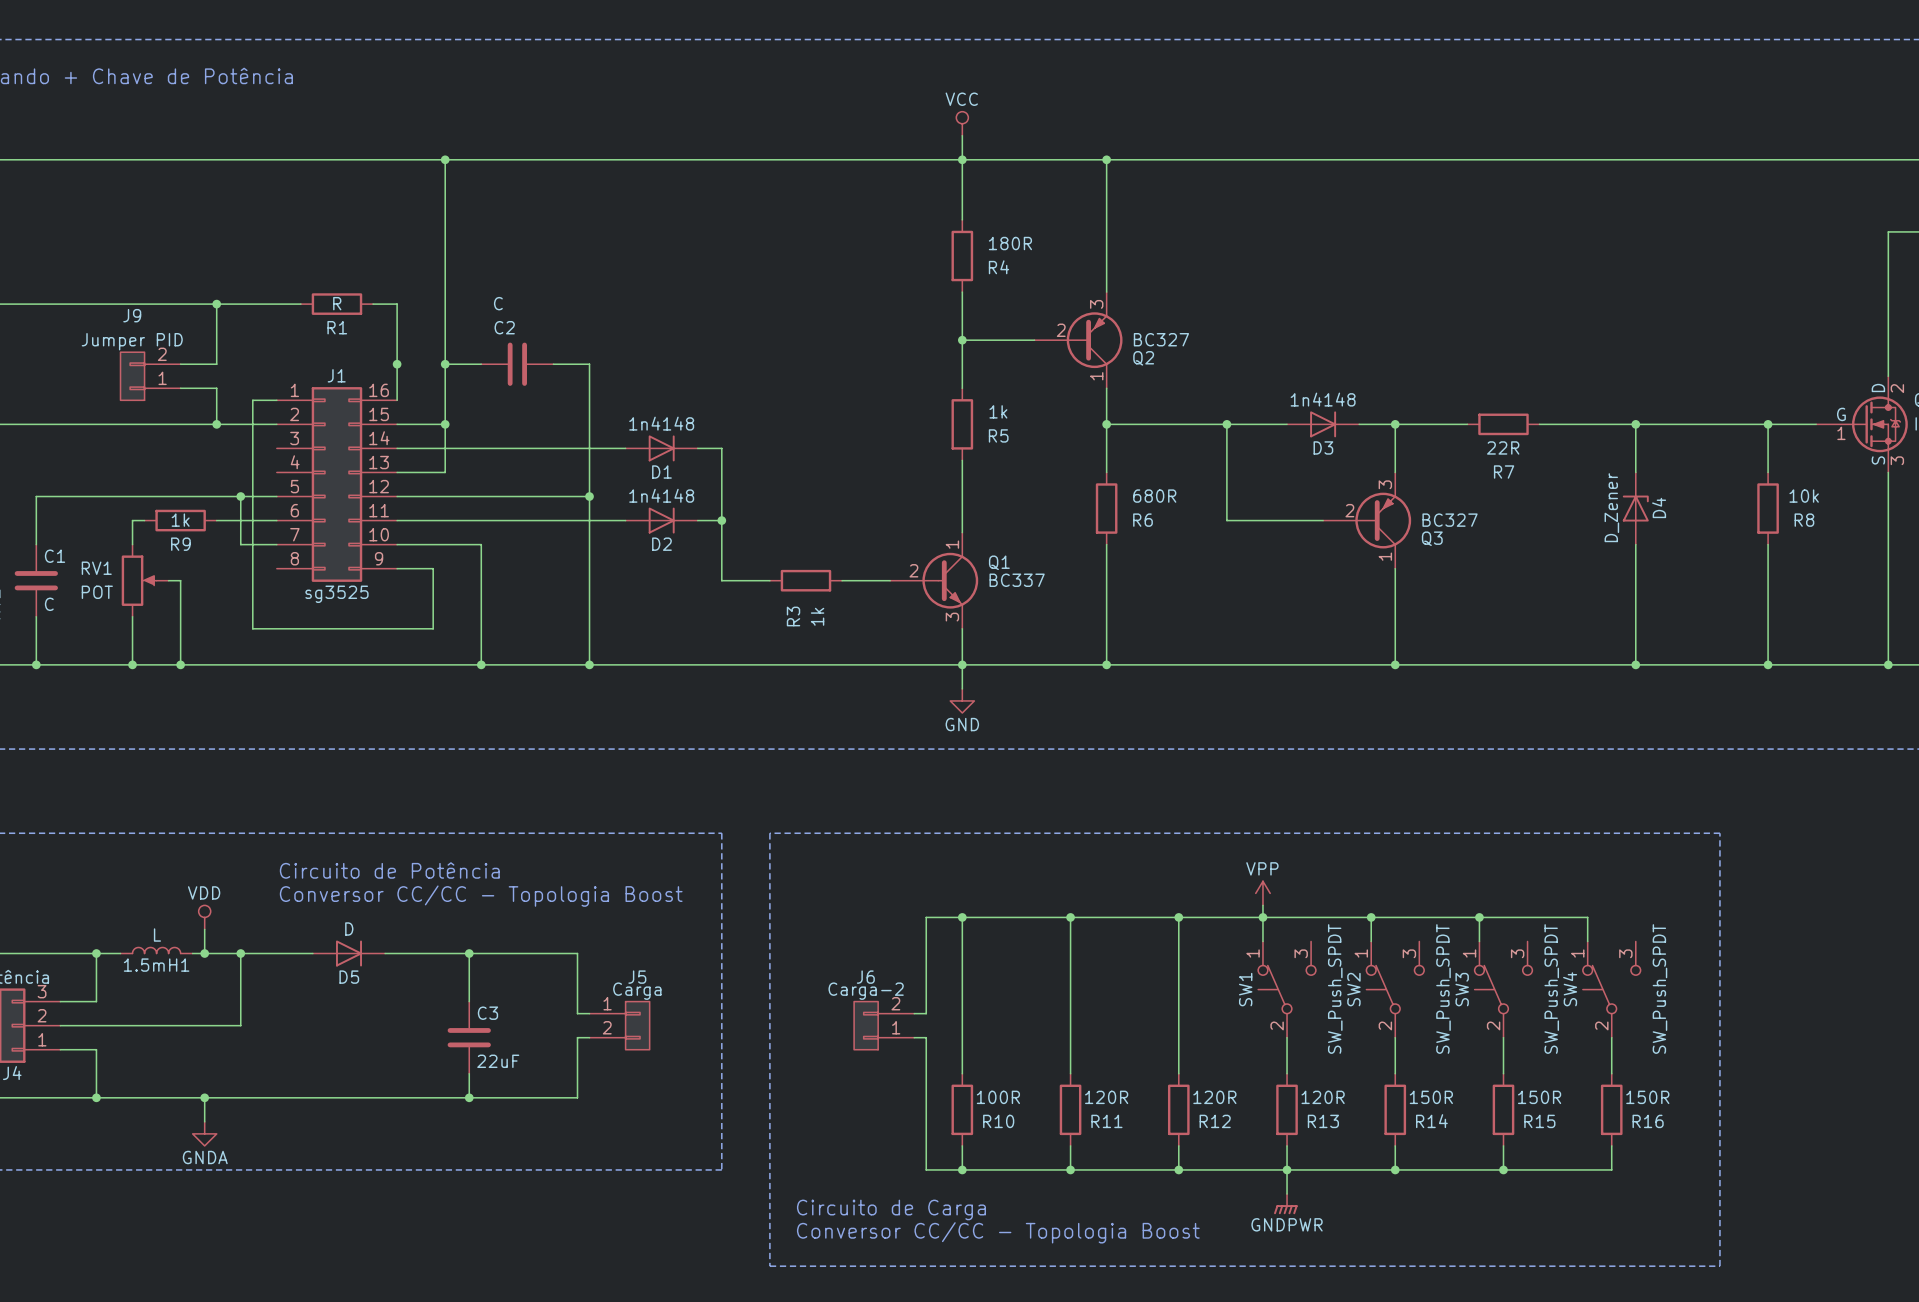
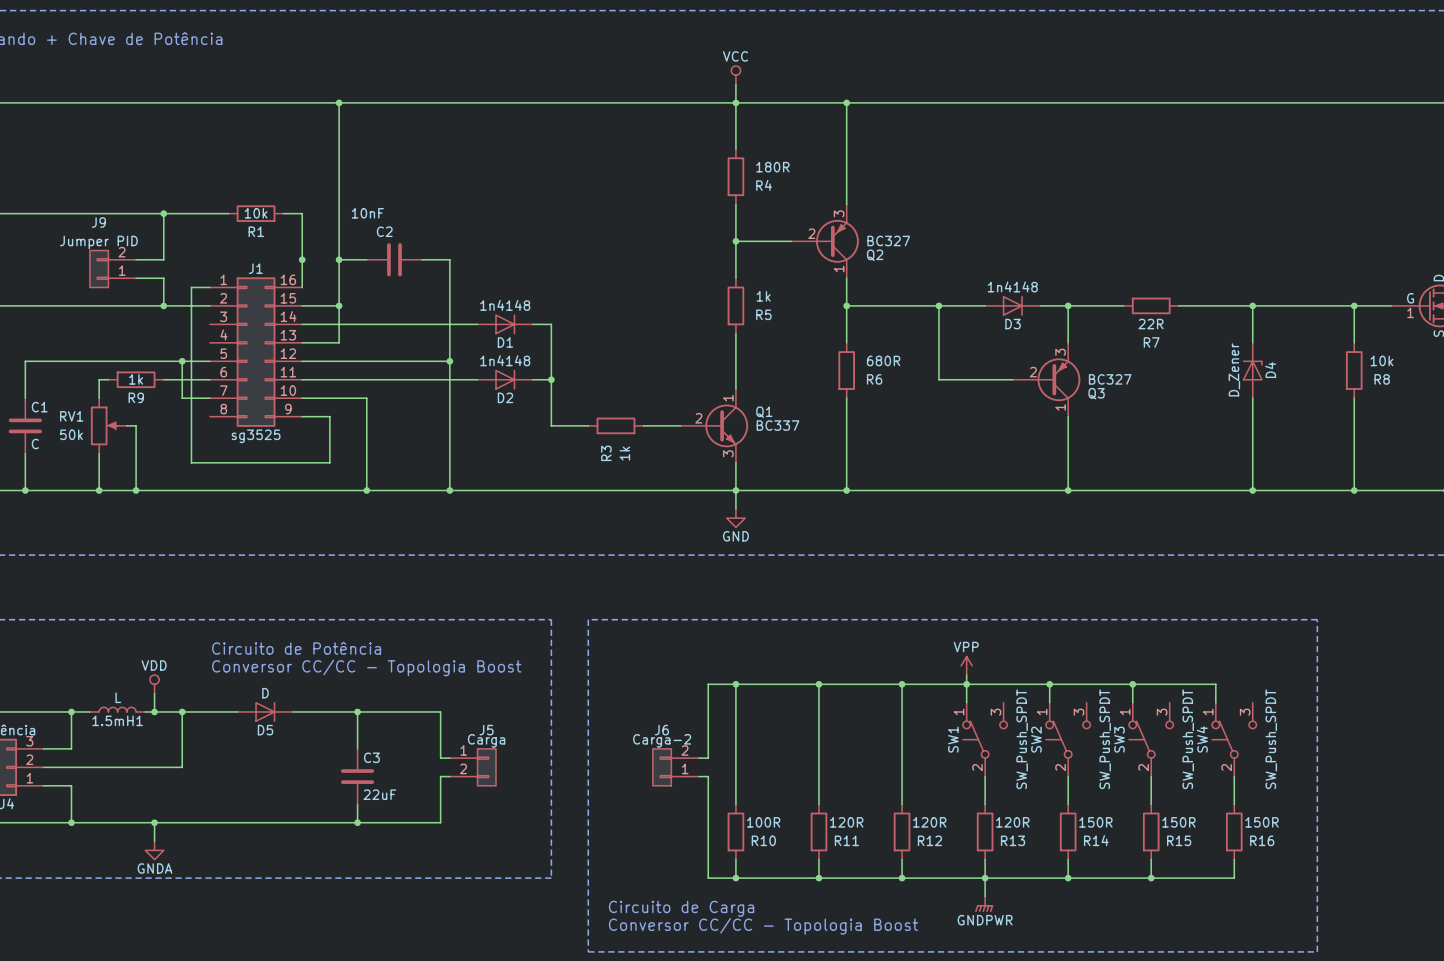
R1 value: R (337, 303) -> 10k (256, 213)
C2 value: C (498, 303) -> 10nF (367, 213)
RV1 value: POT (97, 592) -> 50k (71, 434)

